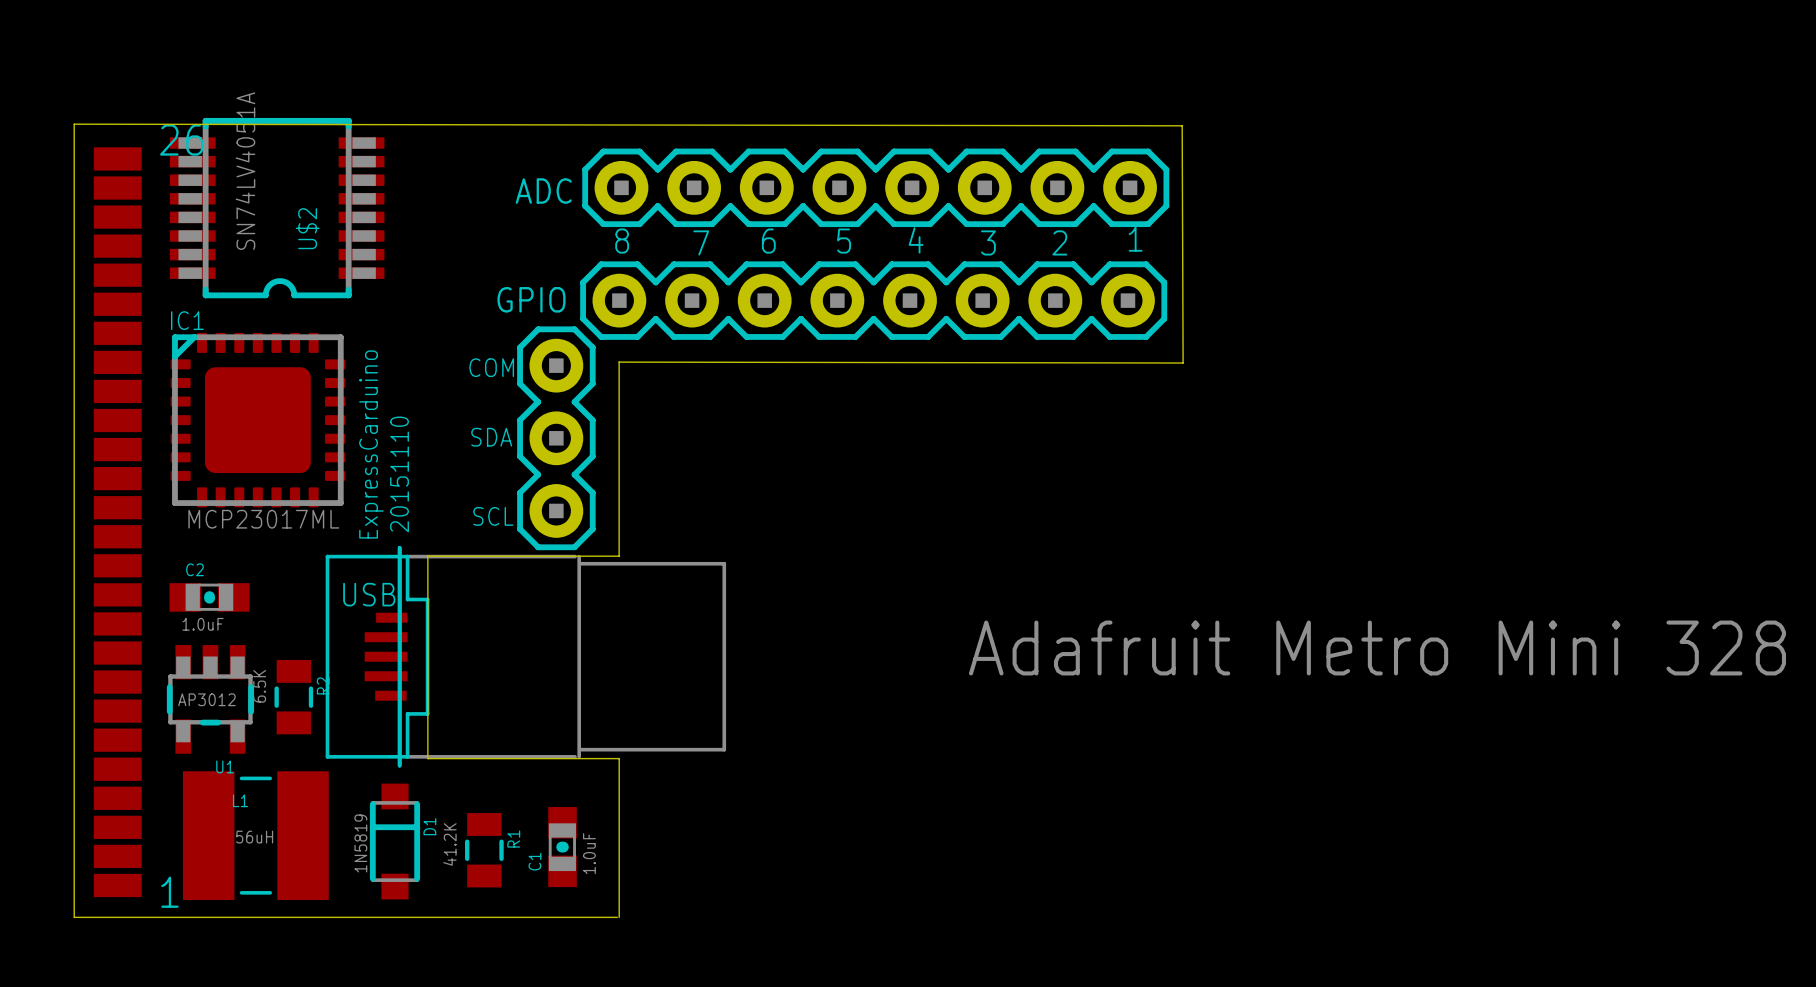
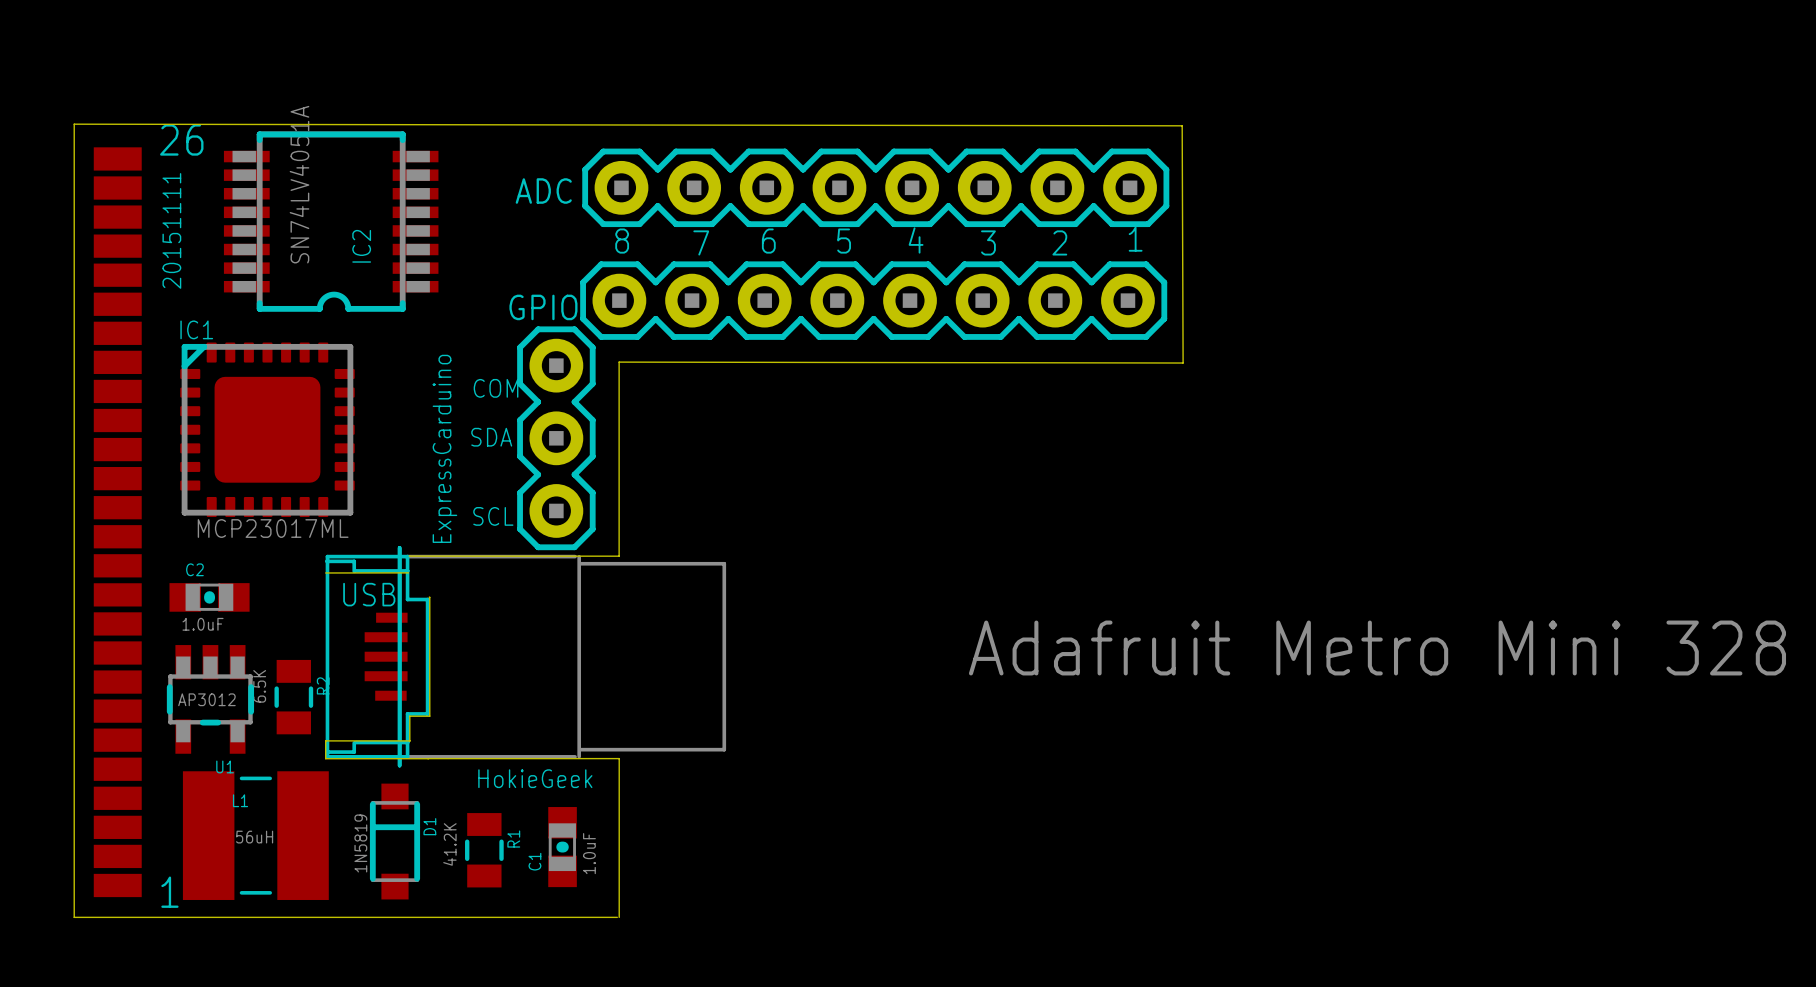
U$2: SN74LV4051A (277, 208) -> none
IC2: none -> SN74LV4051A (331, 221)
text: none -> 20151111 (171, 230)
GPIO name position: GPIO (531, 299) -> GPIO (543, 307)
text position: COM (491, 367) -> COM (496, 388)
IC1 position: (257, 420) -> (267, 429)
text position: ExpressCarduino (371, 444) -> ExpressCarduino (444, 448)
text: 20151110 (399, 474) -> none
USB footprint: [325, 545, 727, 768] -> [325, 545, 727, 768]
board edge: (619, 556) (427, 556) (427, 758) -> (619, 556) (409, 556)
board edge: none -> (325, 572) (408, 572)
board edge: none -> (429, 597) (429, 716) (409, 716) (409, 741)
board edge: none -> (410, 740) (325, 740) (325, 758) (427, 758)
text: none -> HokieGeek (535, 778)

